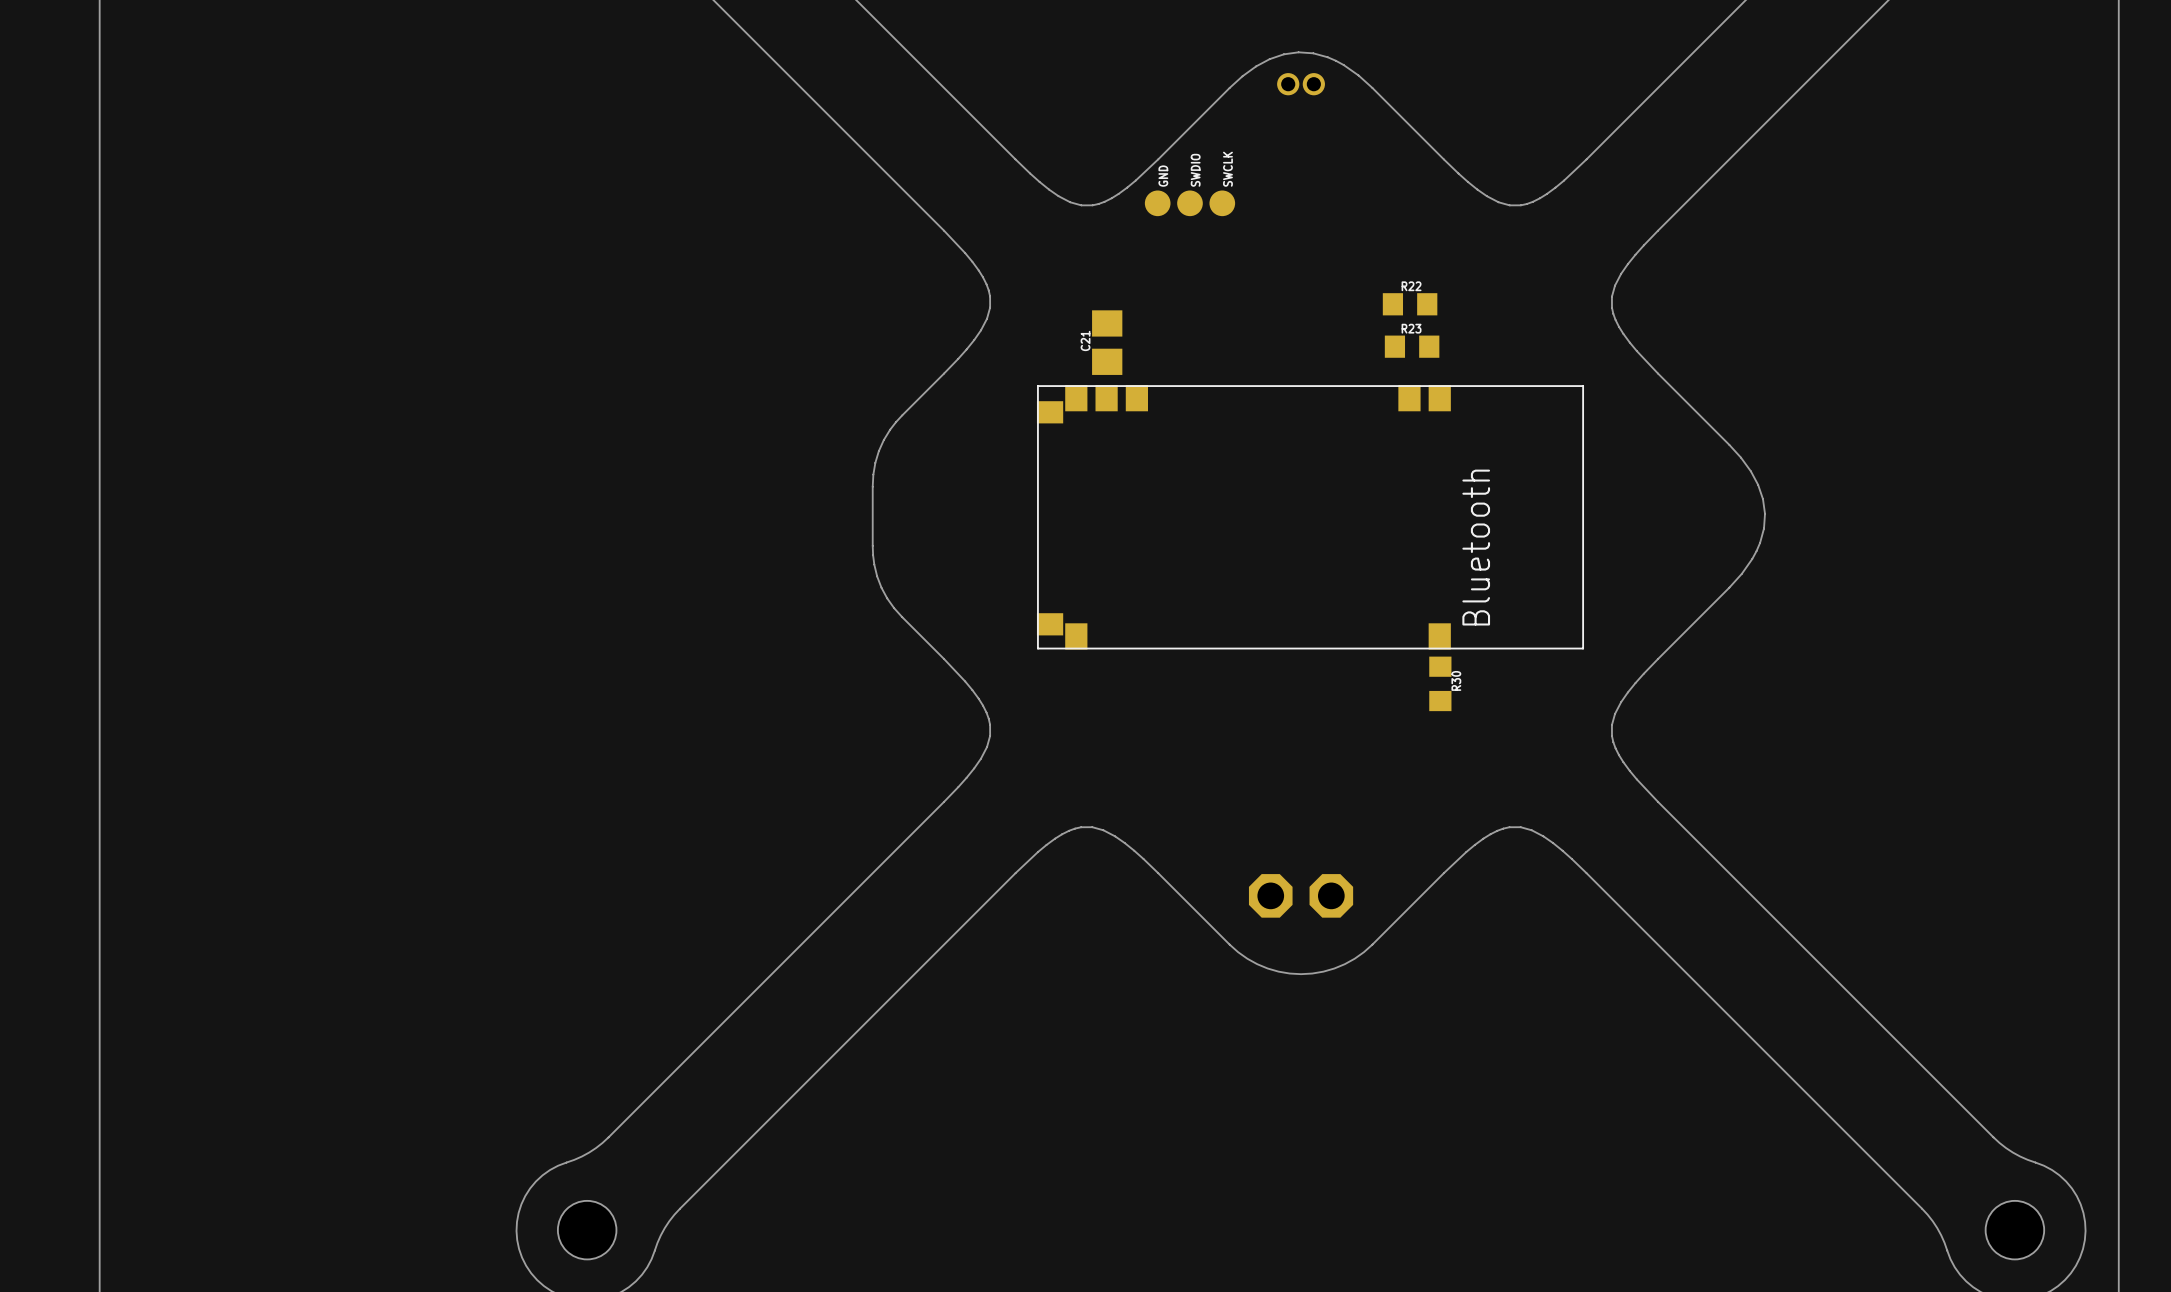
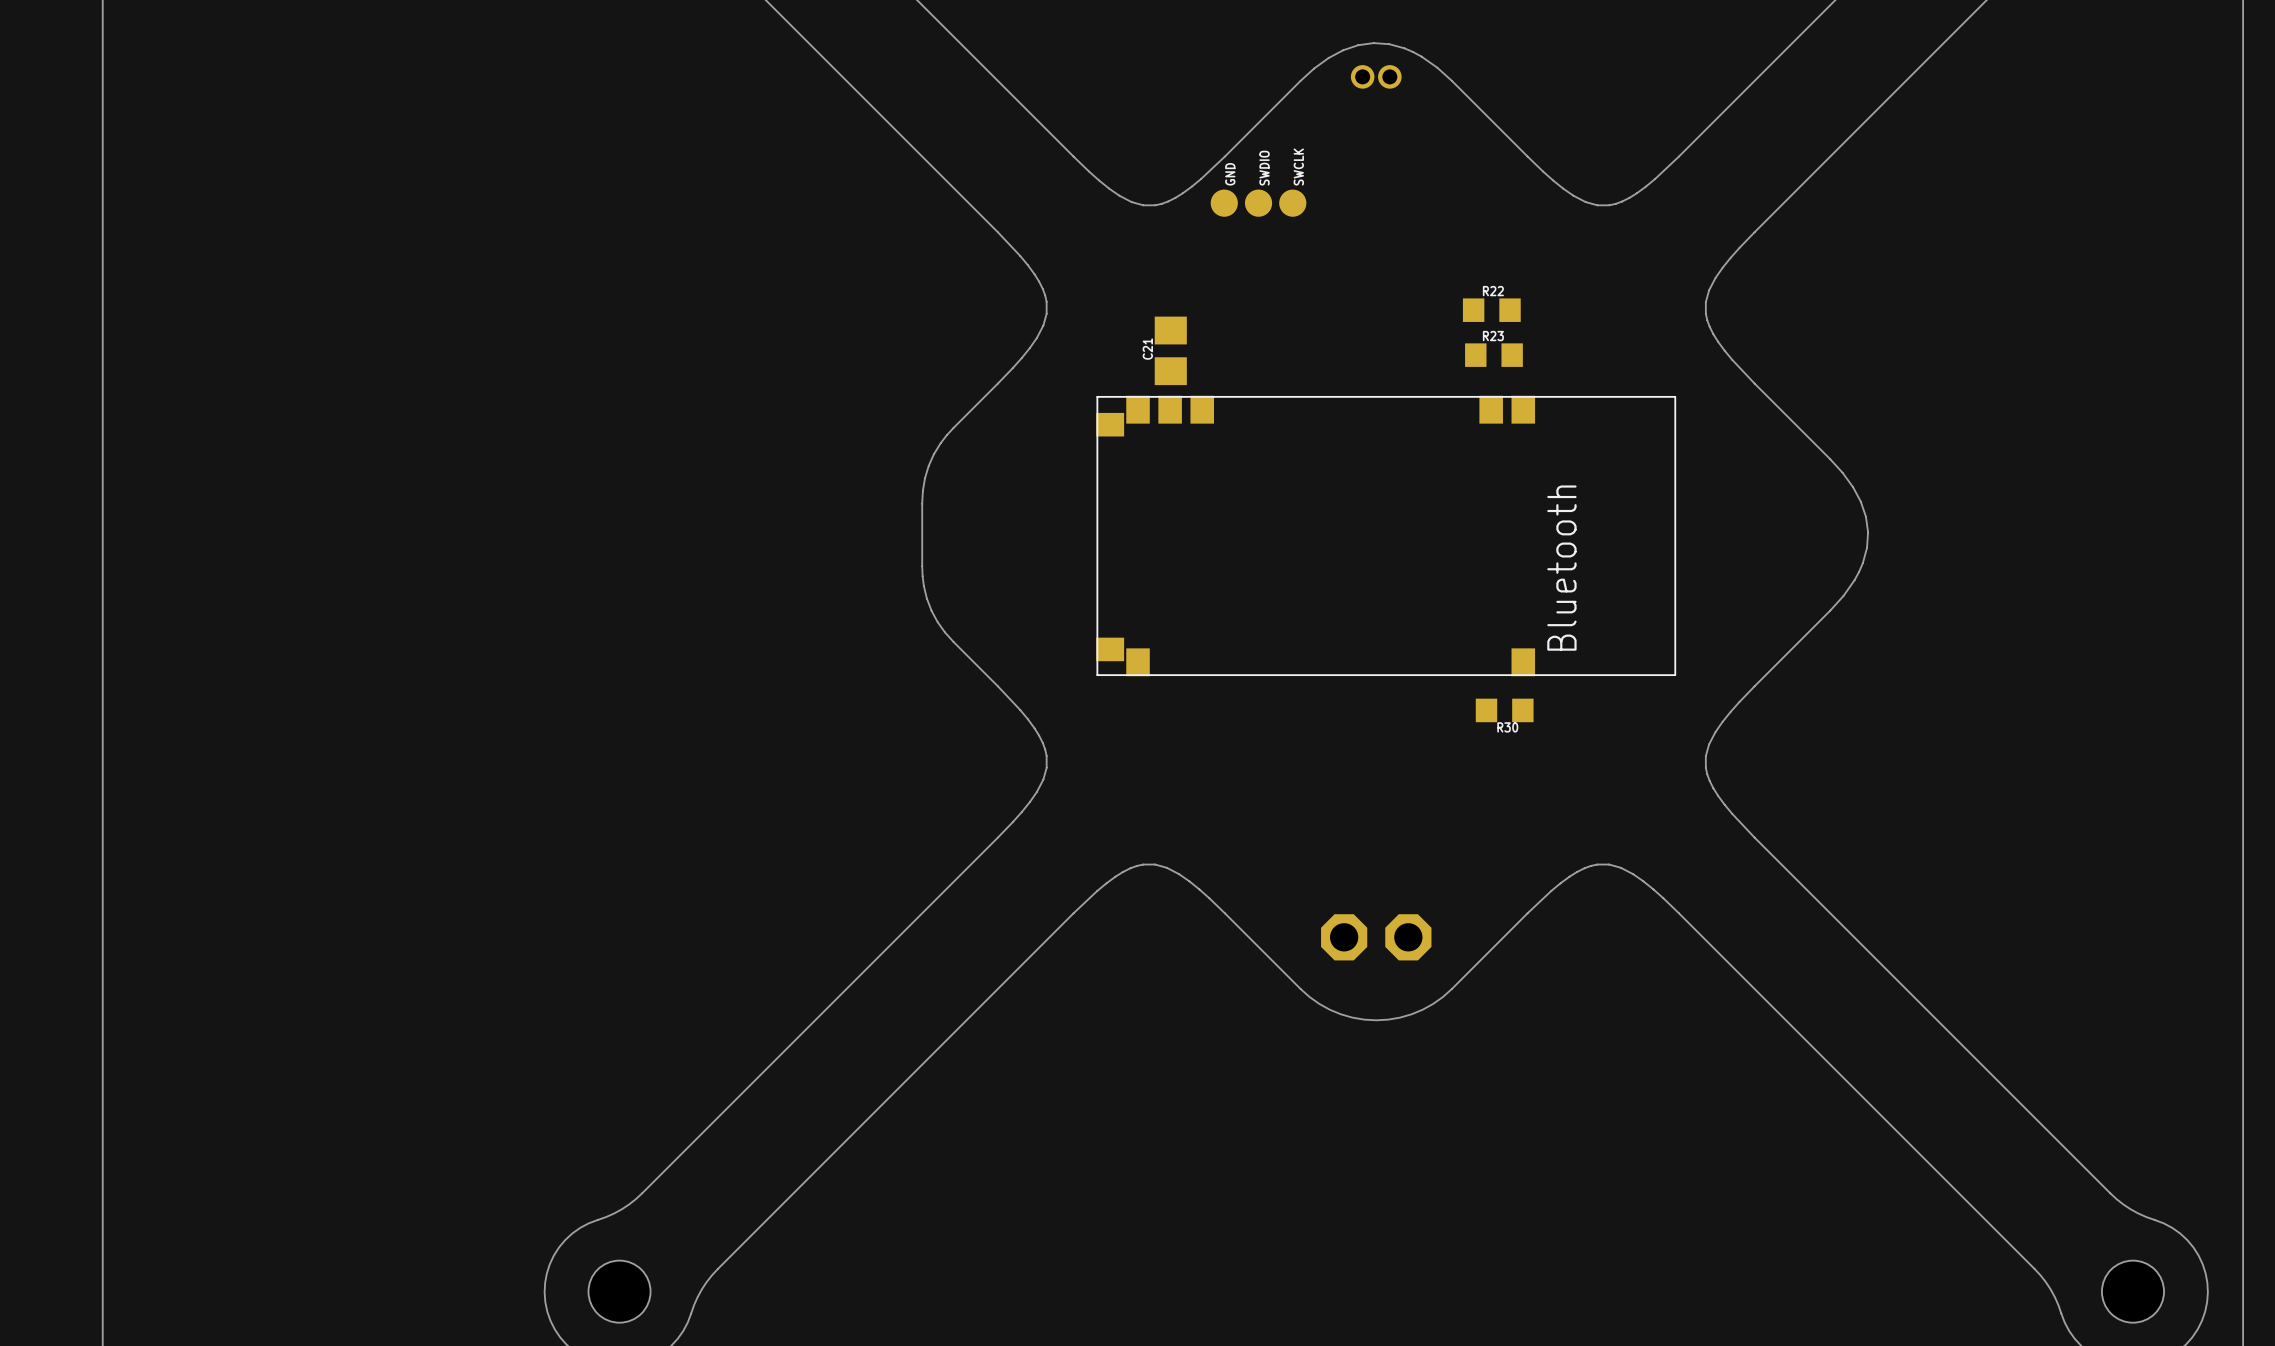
R30 rotation: 0° (1440, 683) -> 90° clockwise (1504, 710)

